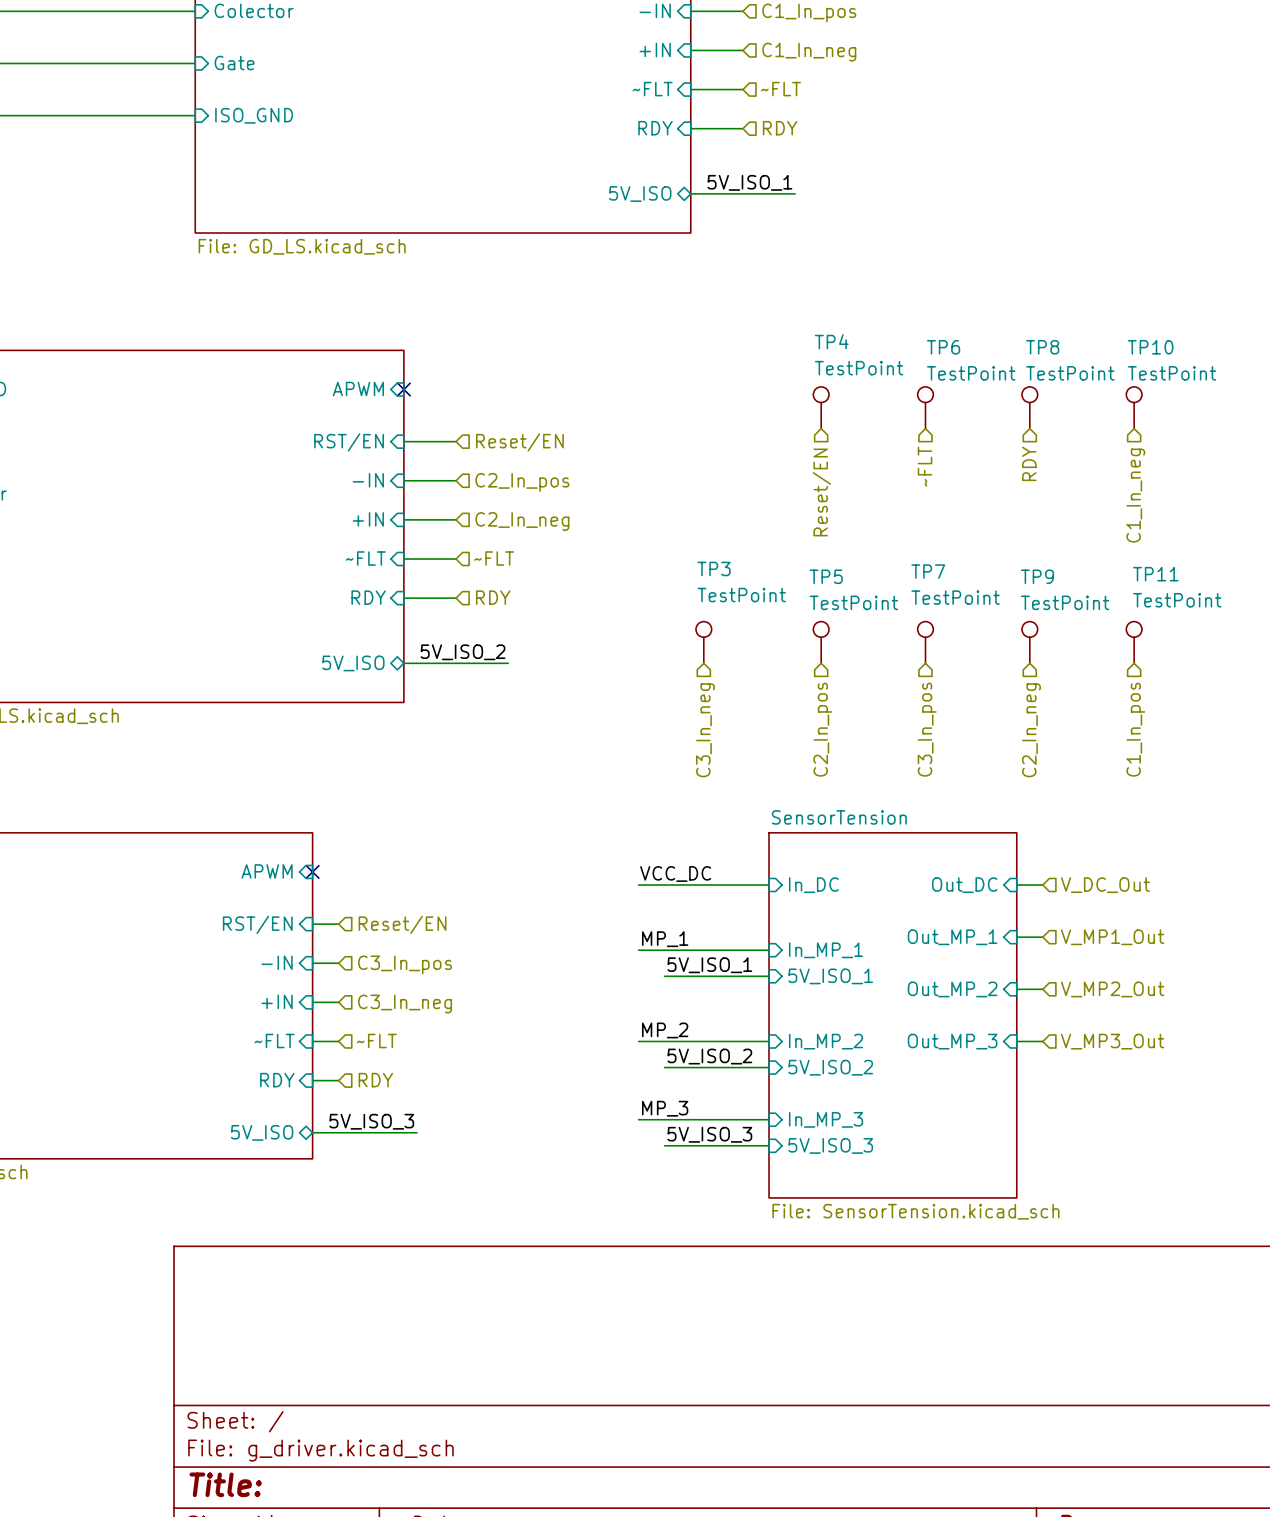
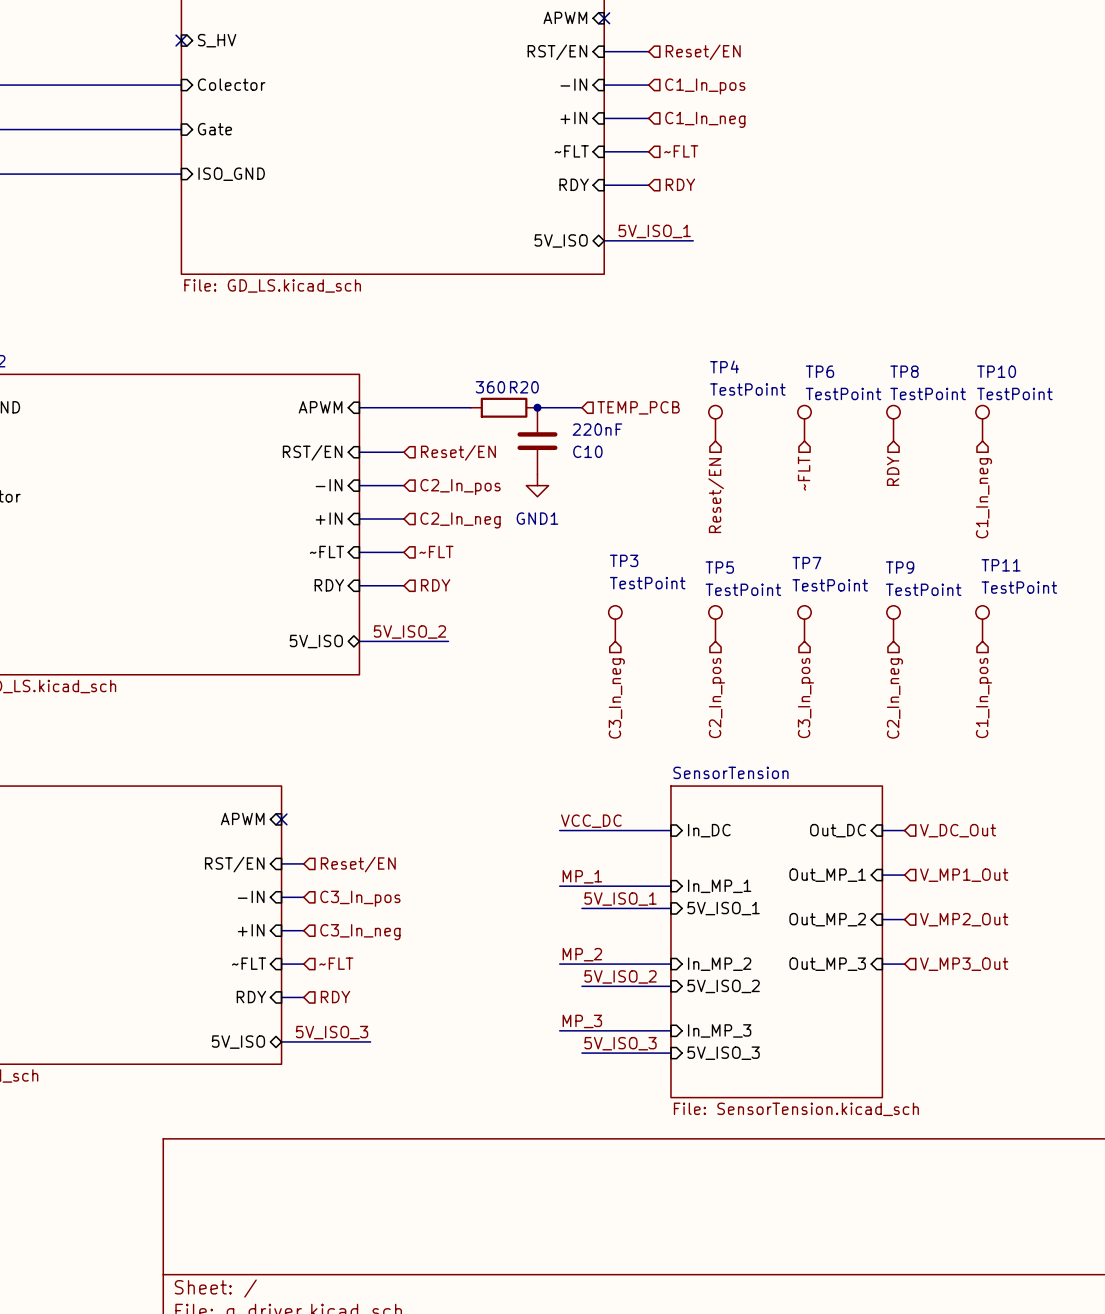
wire: none -> (359, 407) (470, 407)
no-connect mark: (403, 389) -> none
R20: none -> 360 (504, 407)
wire: none -> (537, 407) (581, 407)
junction: none -> (537, 407)
hierarchical label: none -> TEMP_PCB (638, 407)
C10: none -> 220nF (537, 441)
power symbol: none -> GND1 (537, 485)

